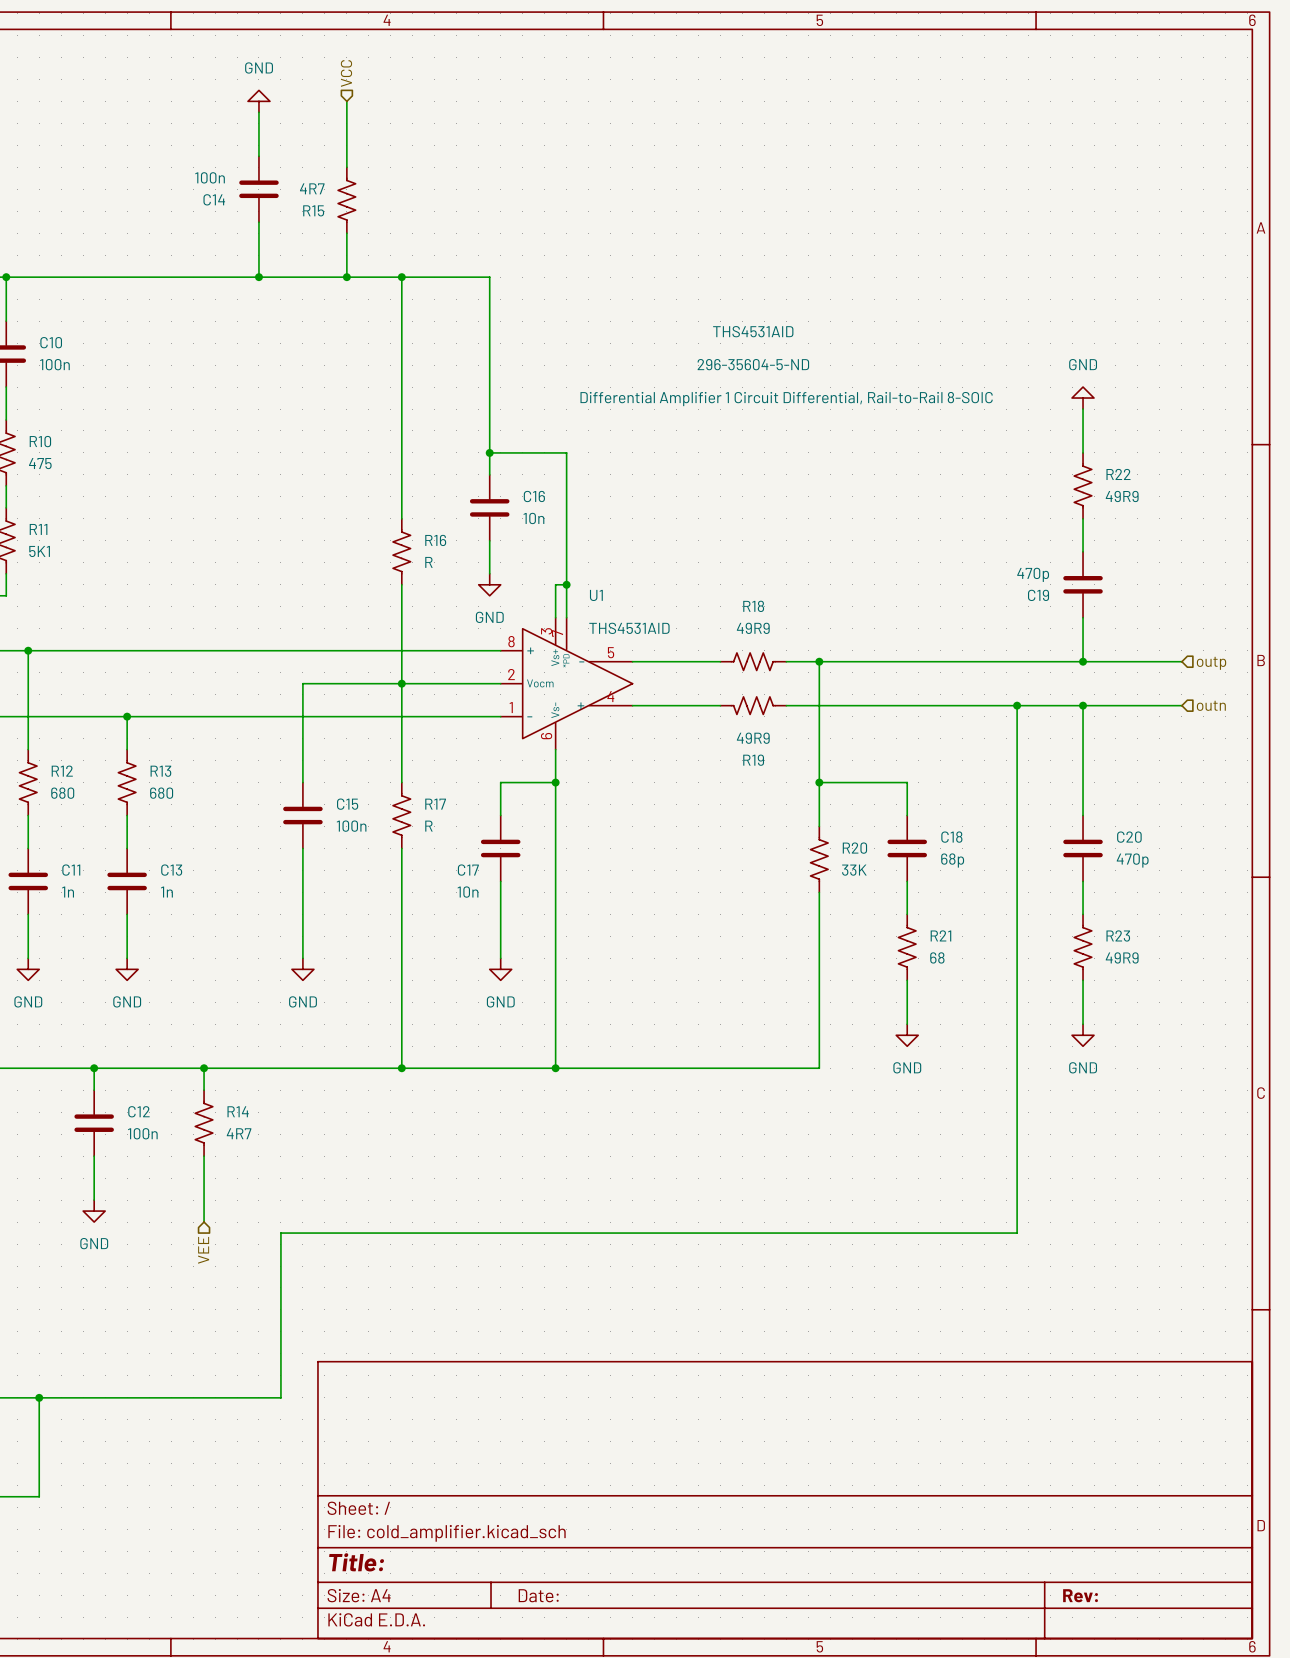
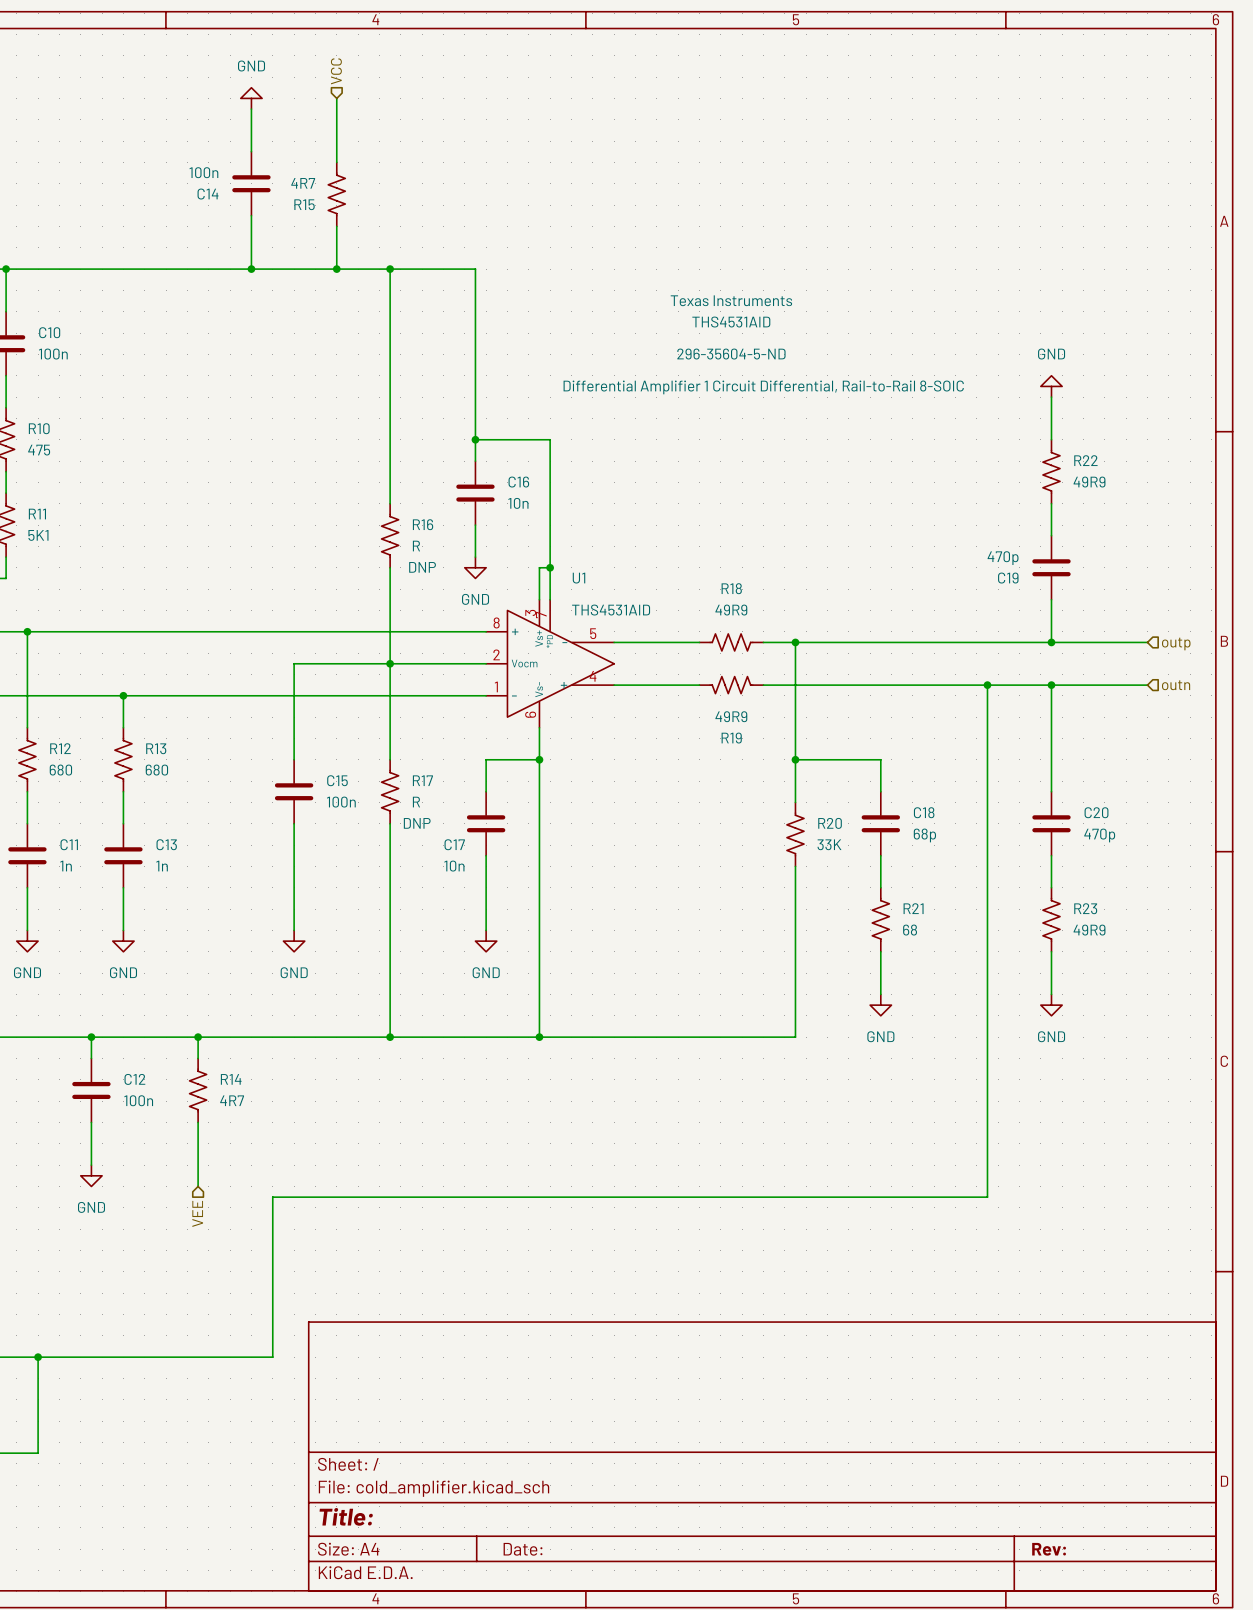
U1 text: none -> Texas Instruments (731, 300)
R16 text: none -> DNP (422, 567)
R17 text: none -> DNP (417, 823)

